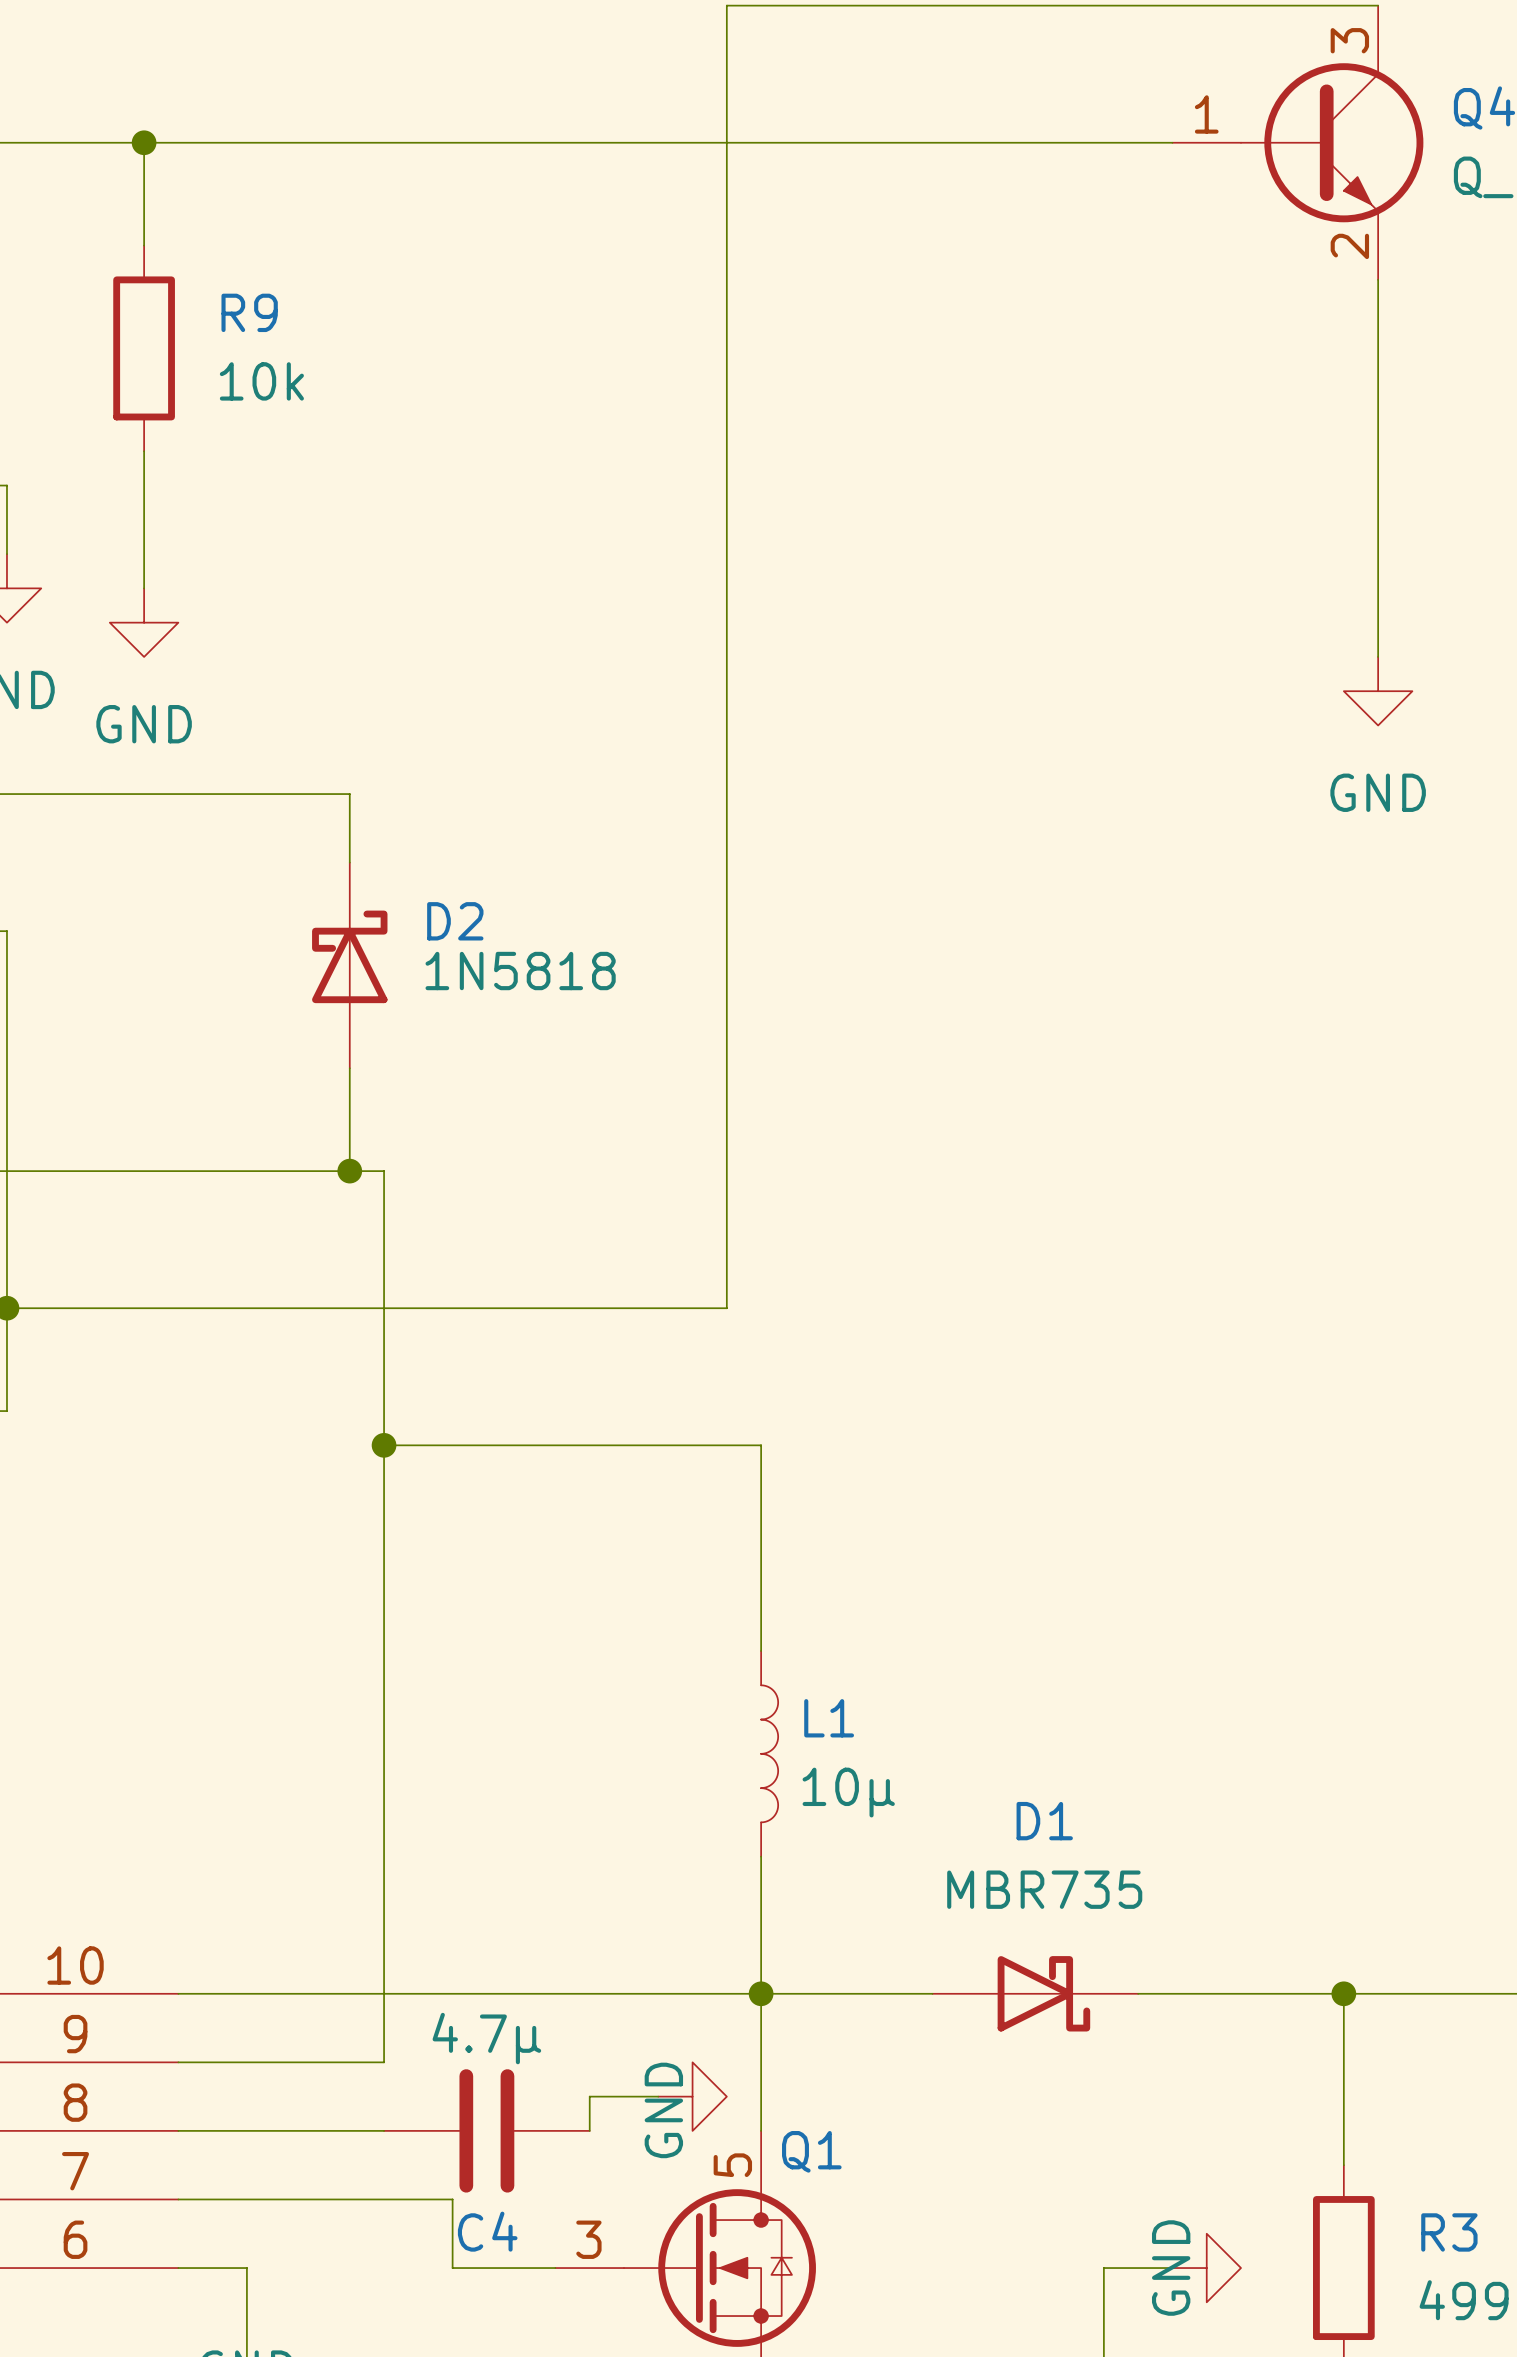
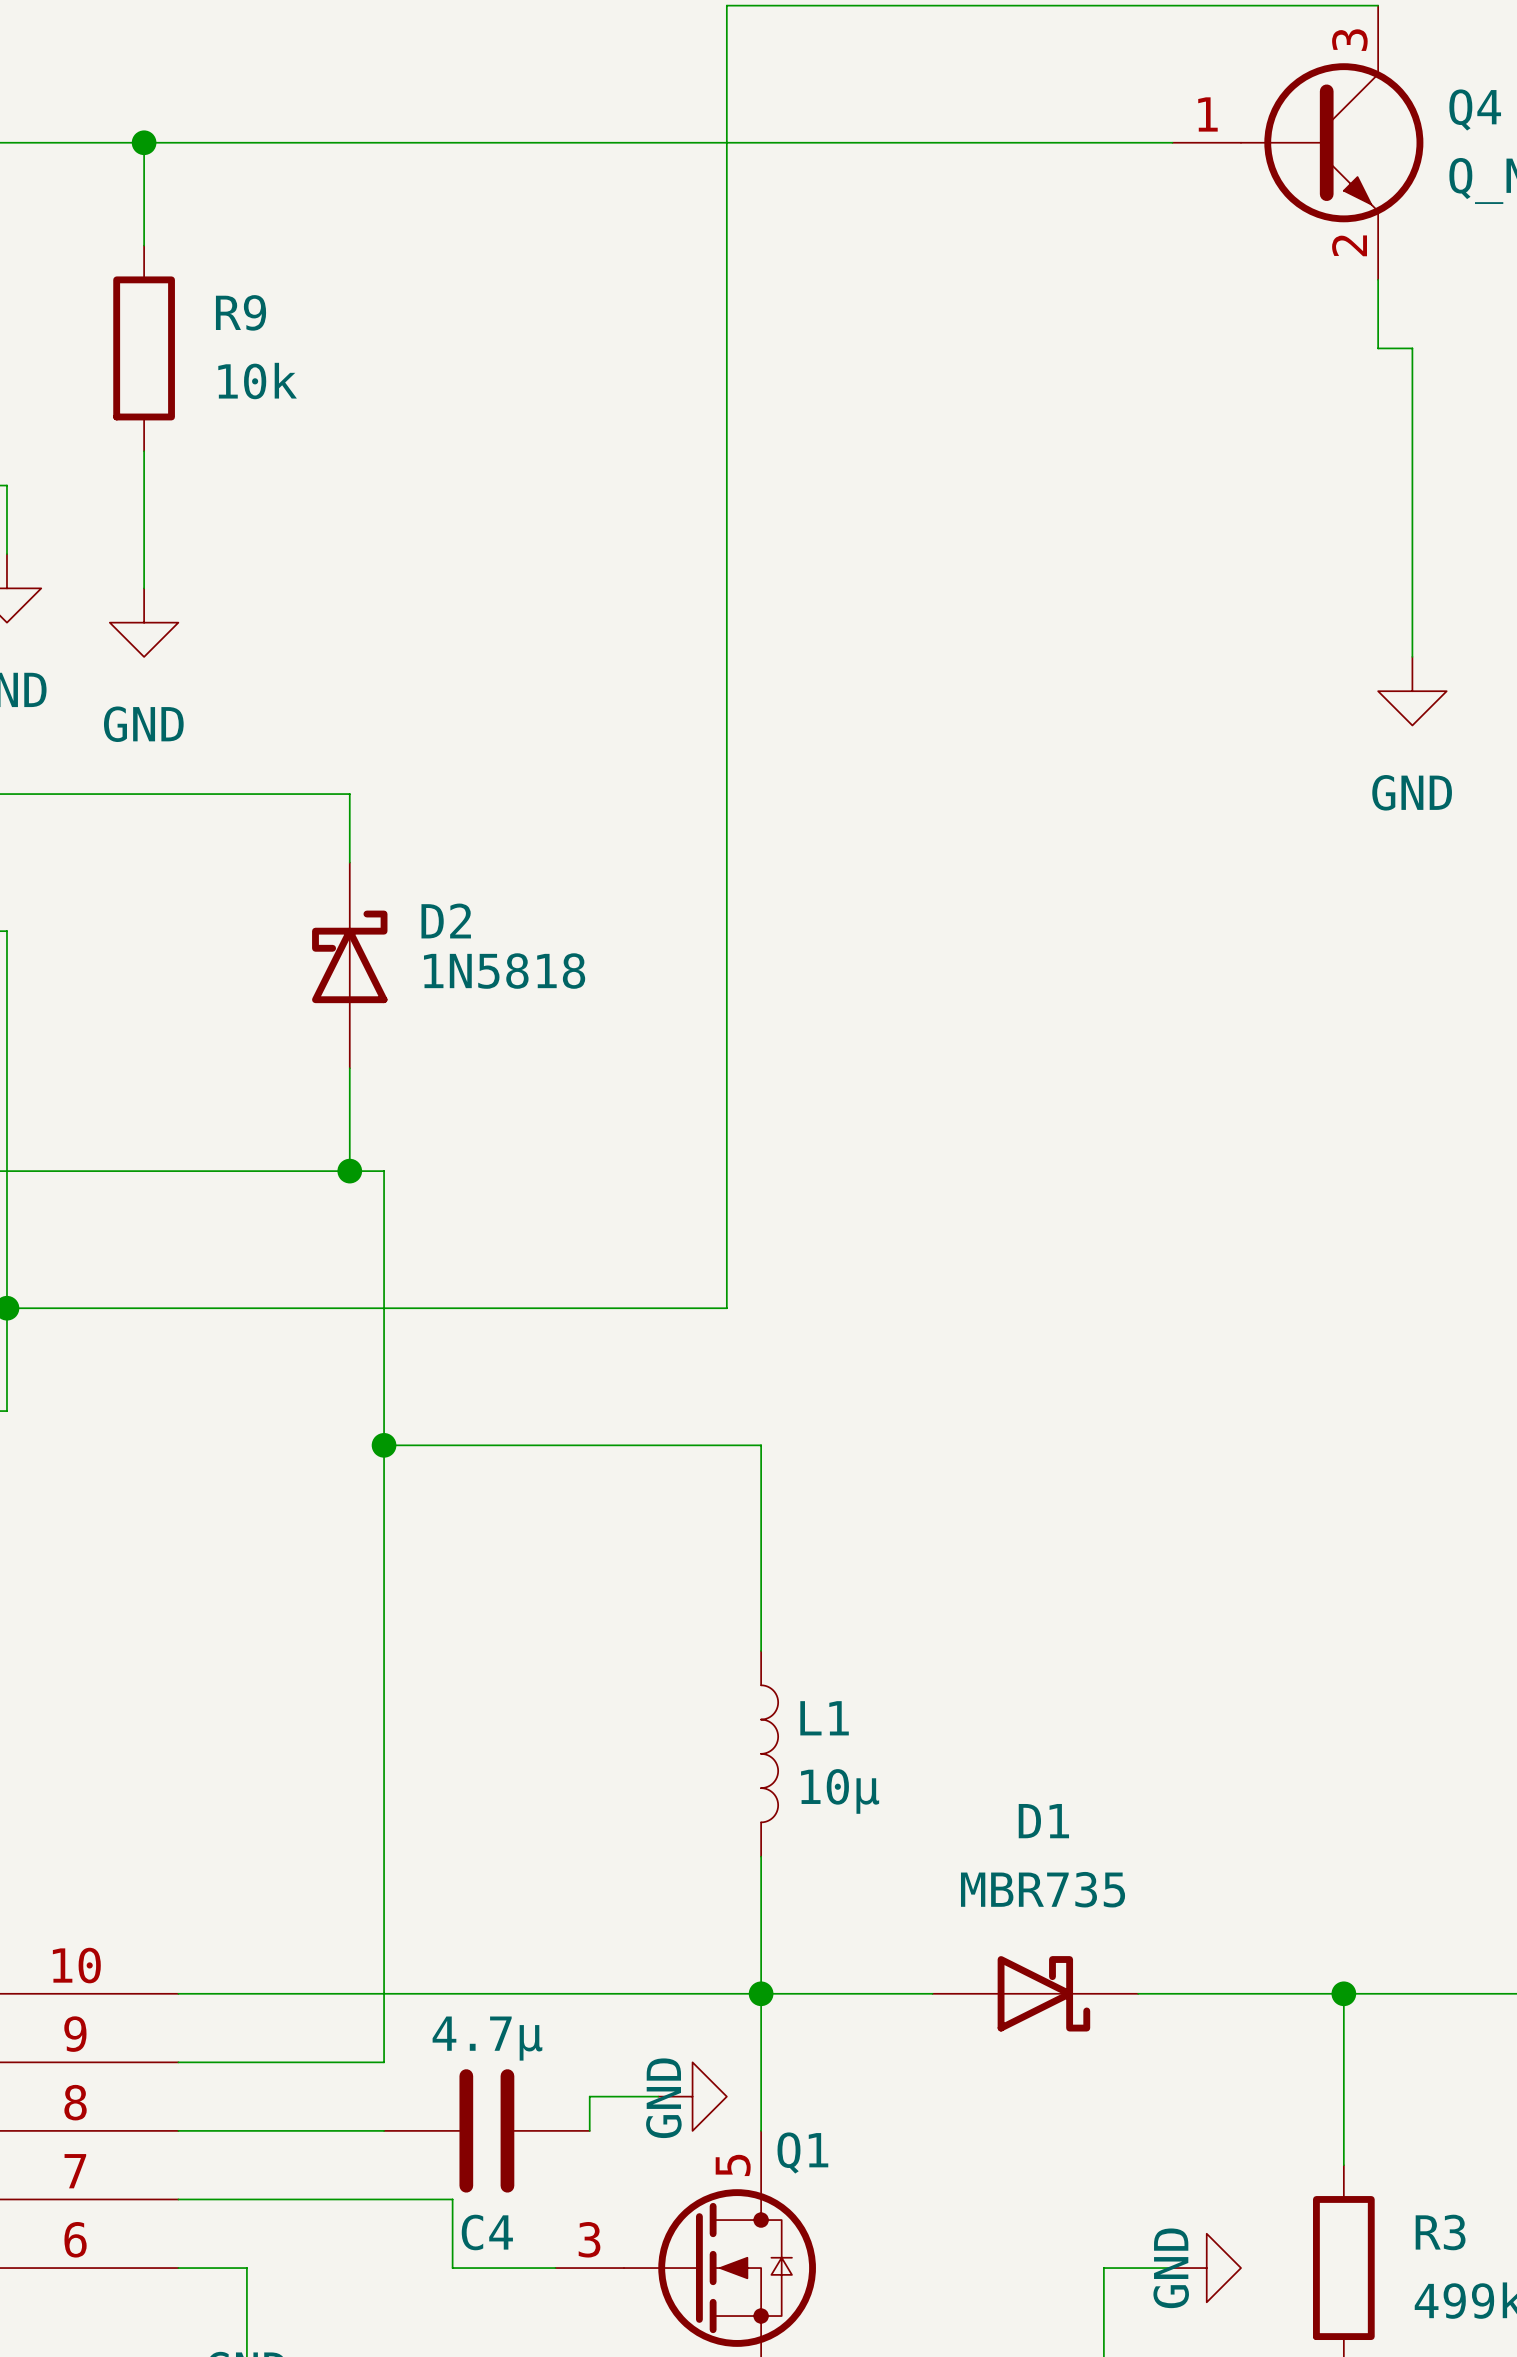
wire: (1378, 348) (1378, 656) -> (1378, 348) (1412, 348) (1412, 656)
power symbol position: GND (1378, 691) -> GND (1412, 691)

